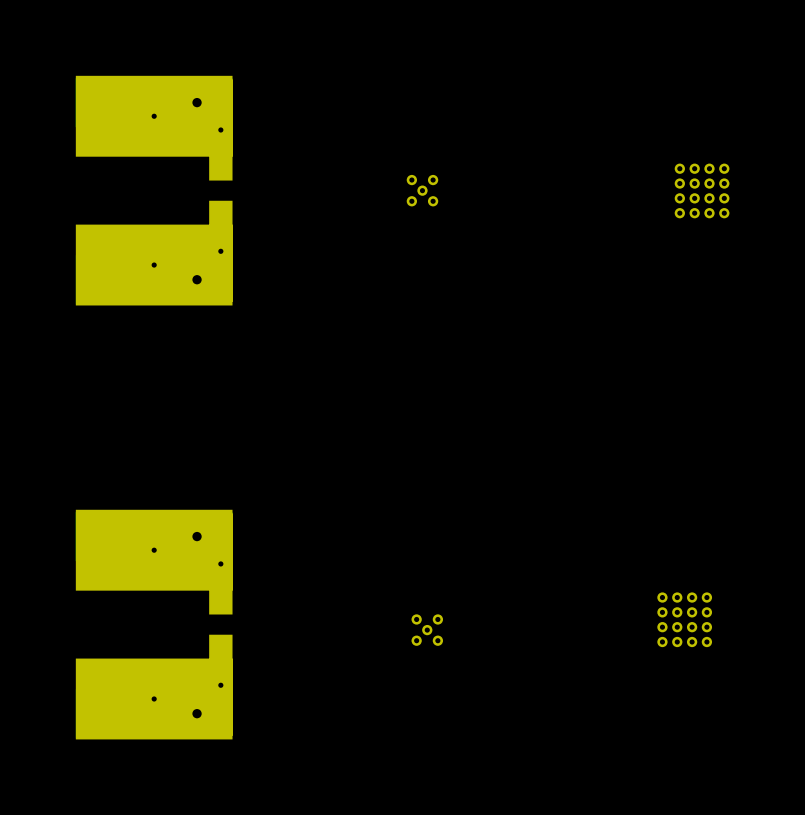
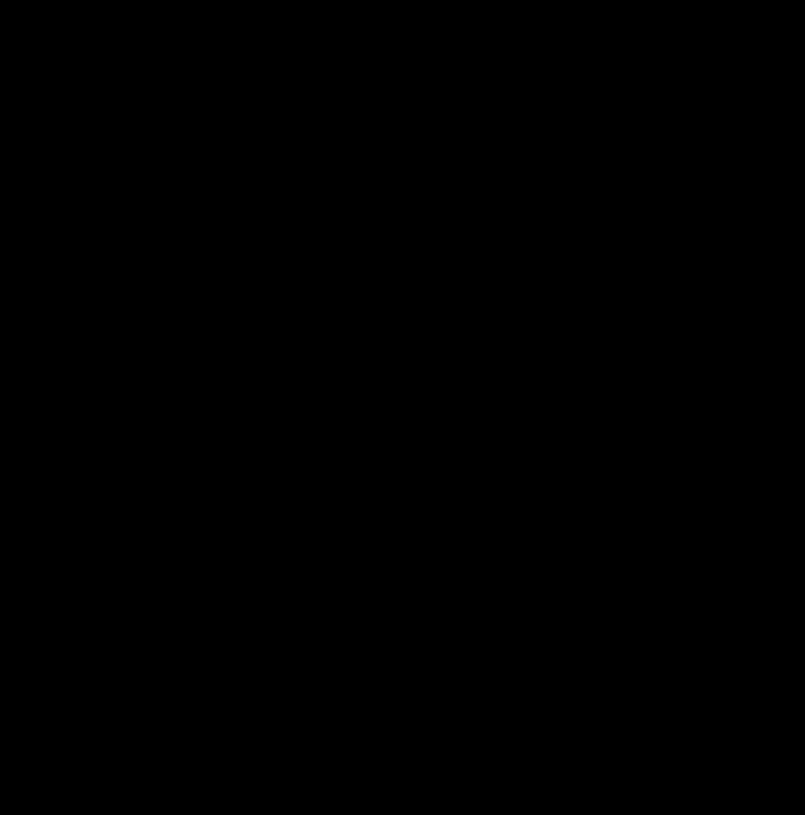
part: (154, 190) -> none
part: (422, 190) -> none
part: (702, 190) -> none
part: (684, 619) -> none
part: (154, 624) -> none
part: (427, 630) -> none

